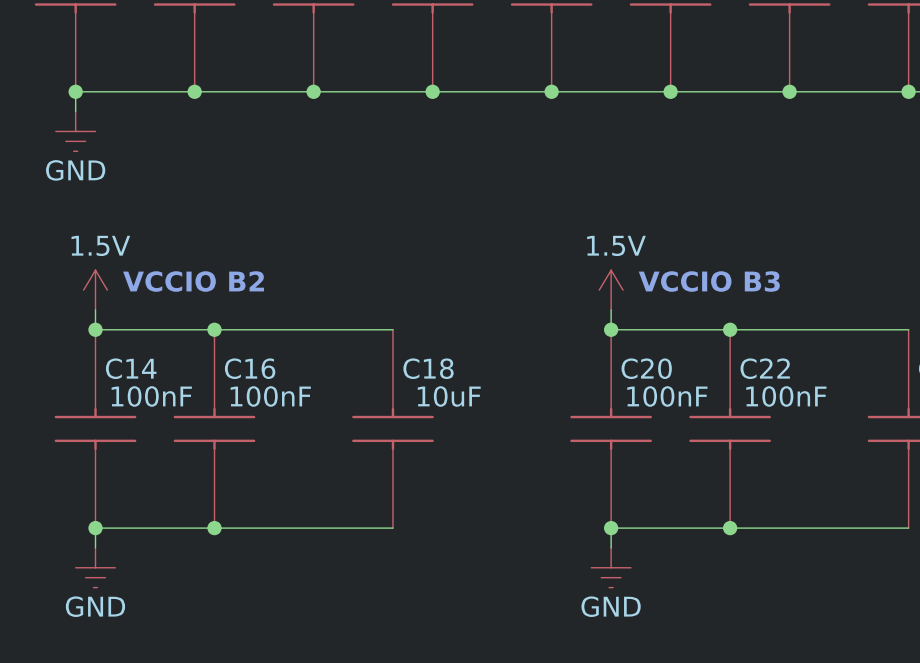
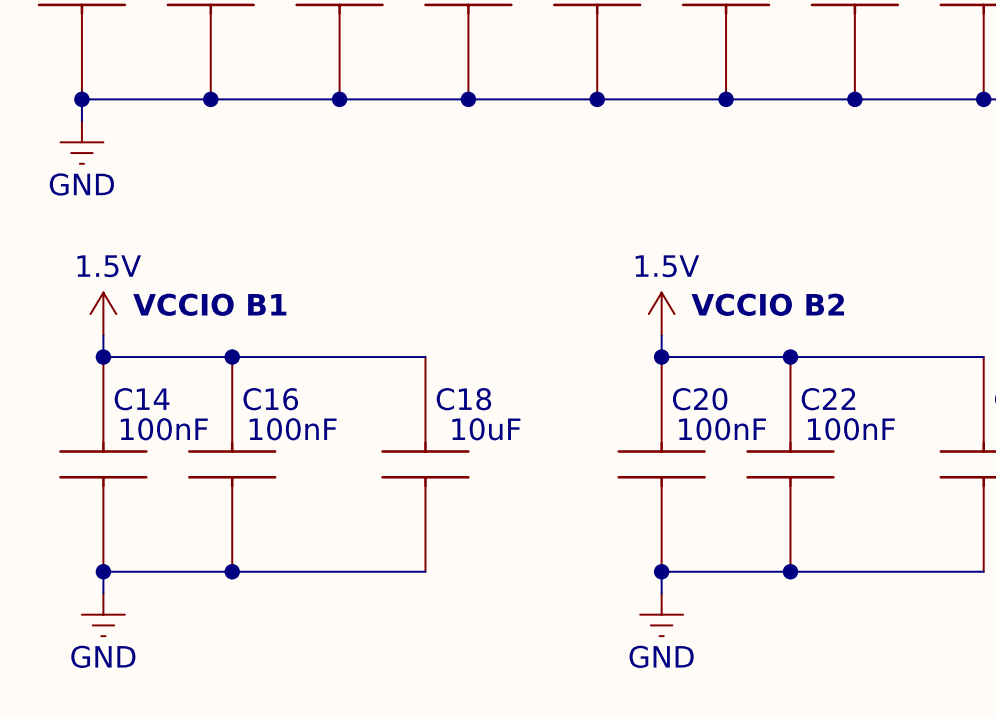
text: VCCIO B2 (193, 281) -> VCCIO B1 (209, 304)
text: VCCIO B3 (709, 281) -> VCCIO B2 (767, 304)

